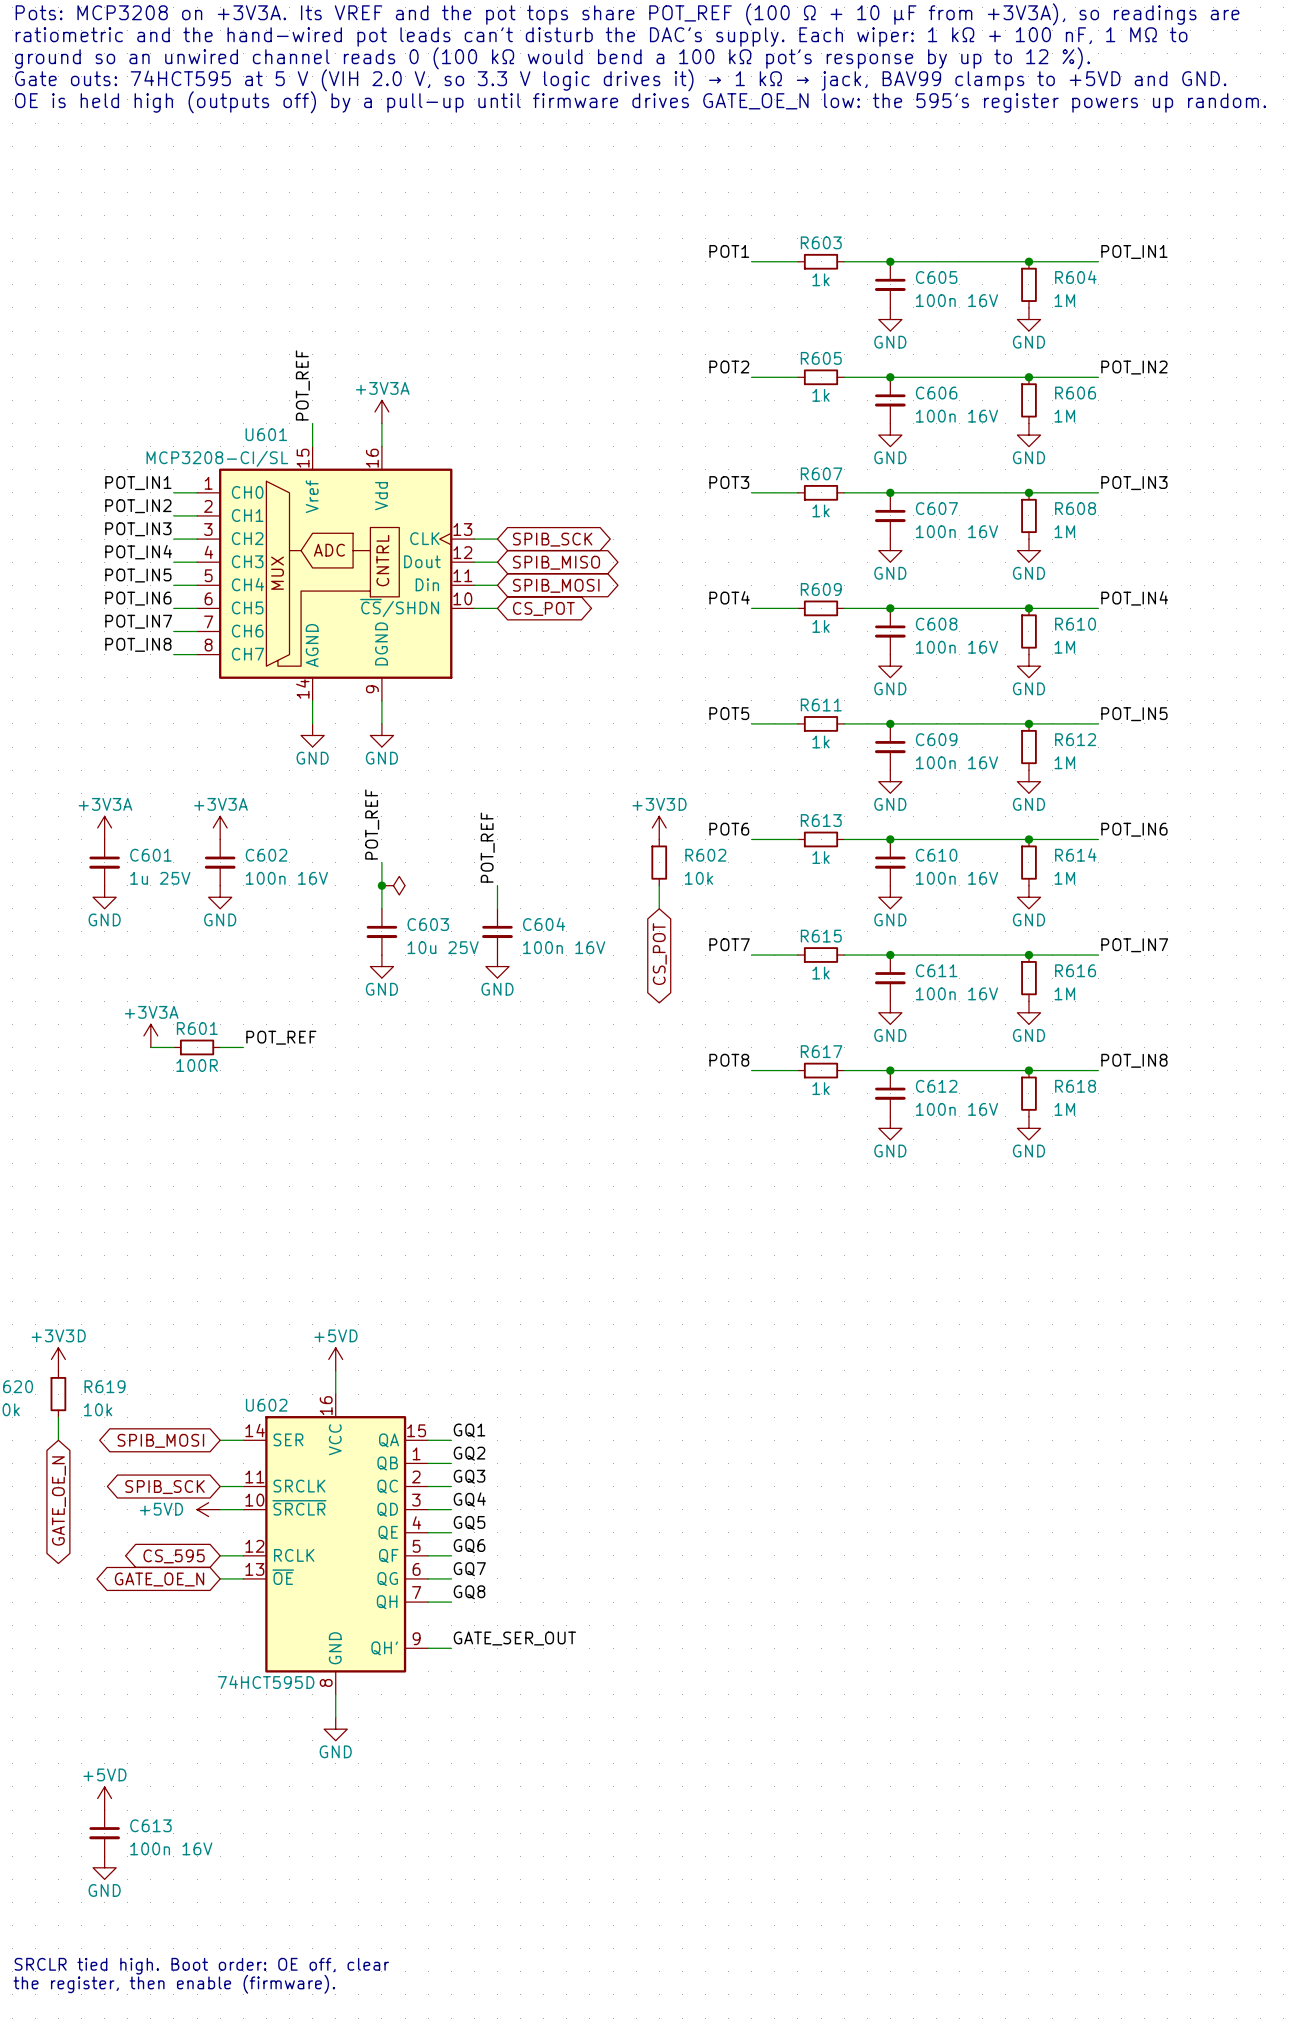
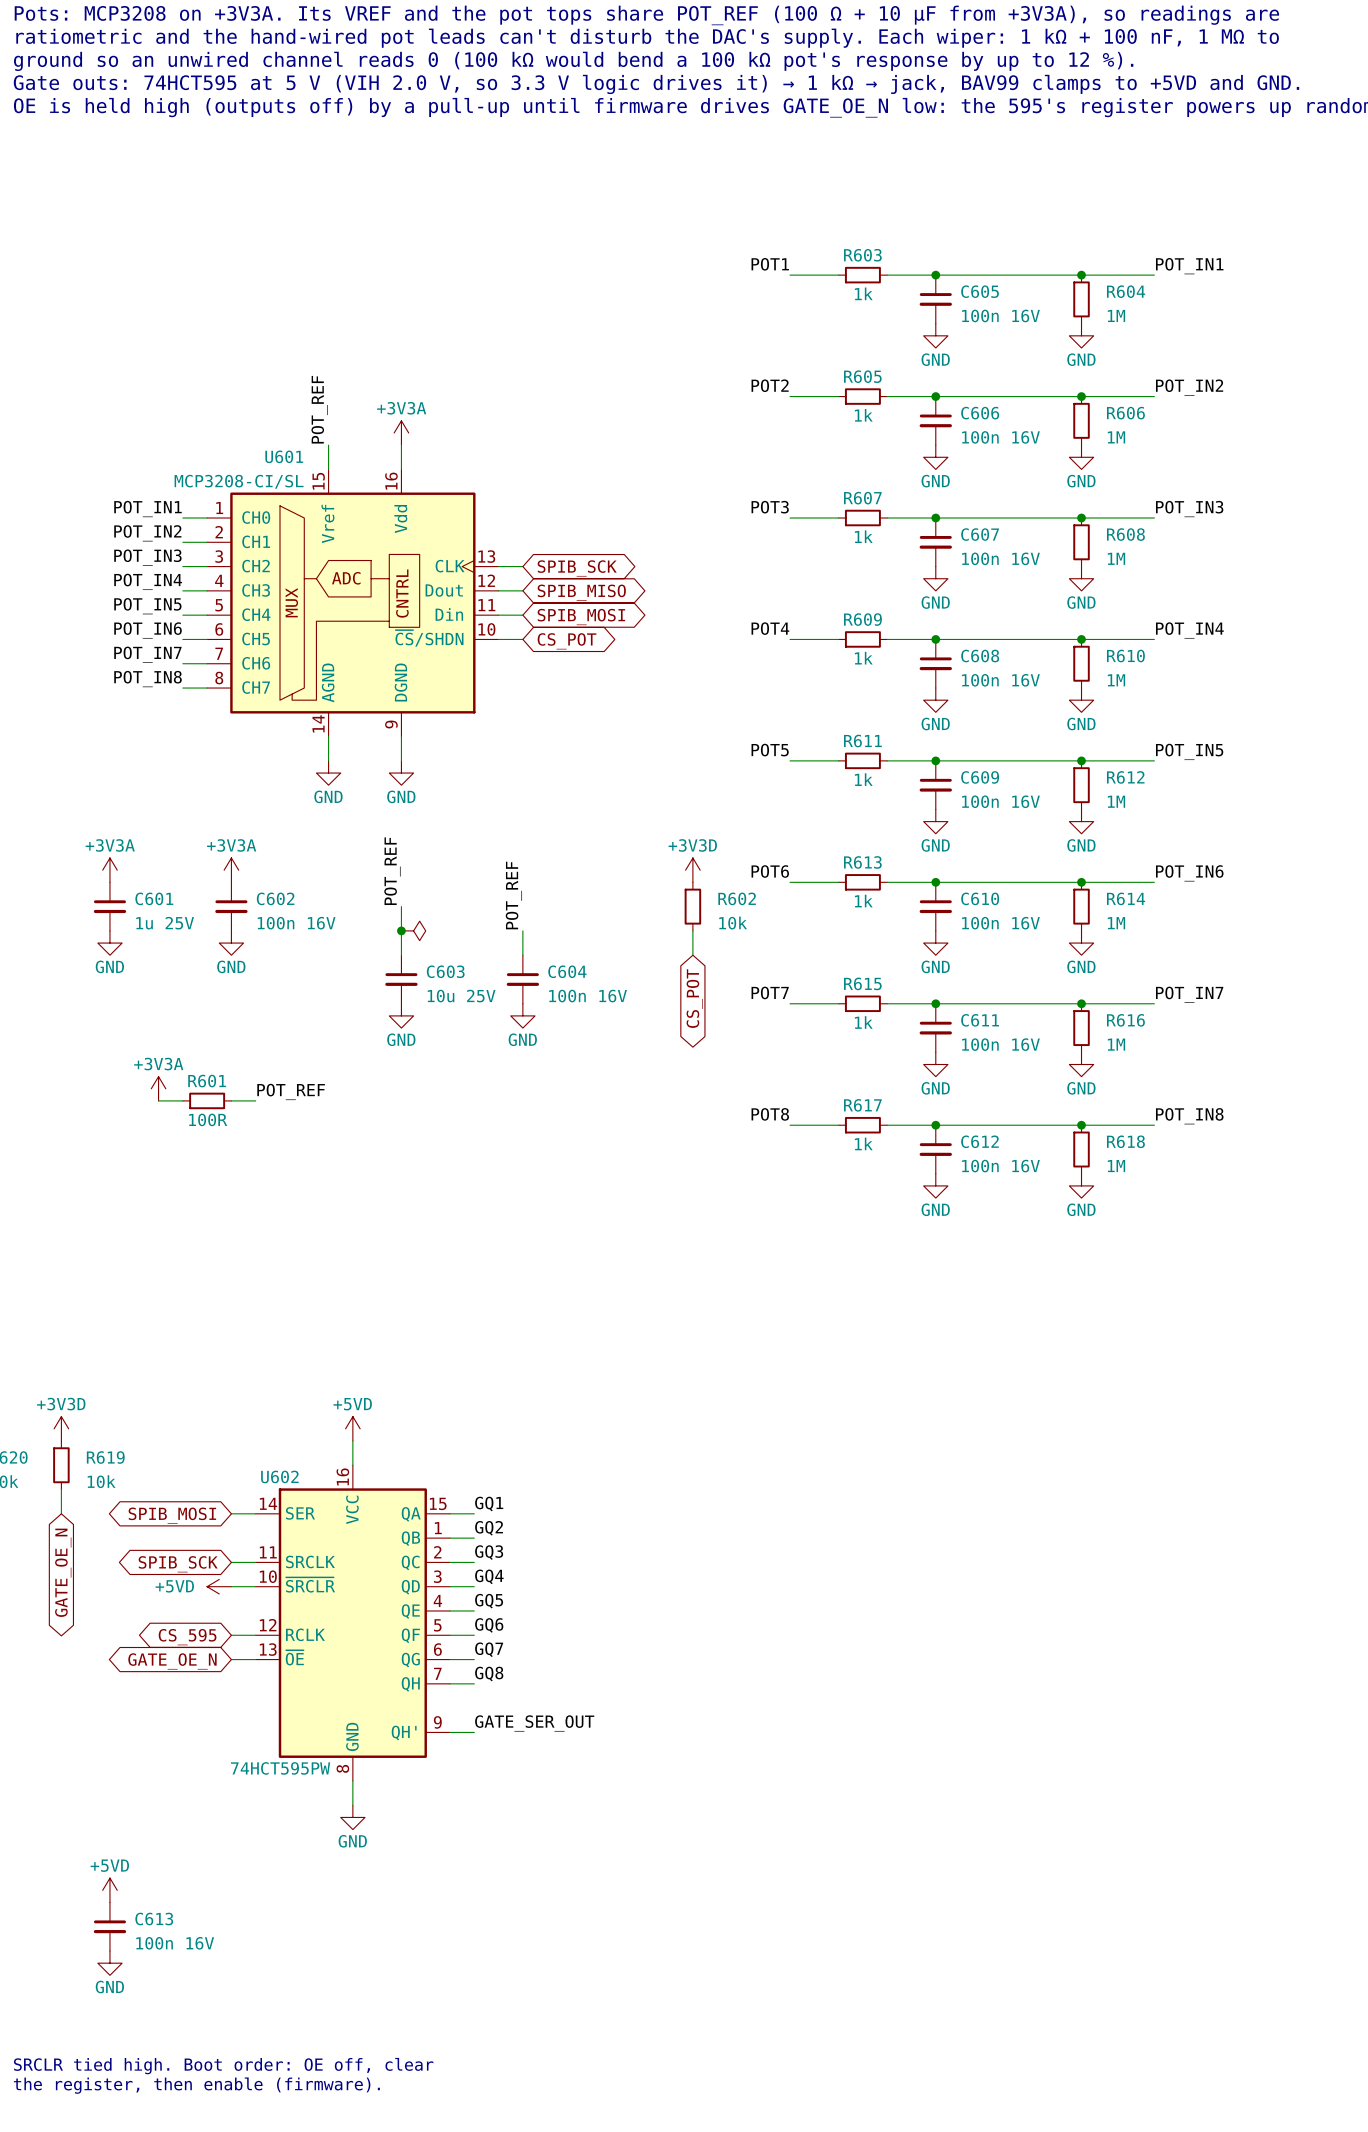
U602 value: 74HCT595D (266, 1682) -> 74HCT595PW (280, 1768)

